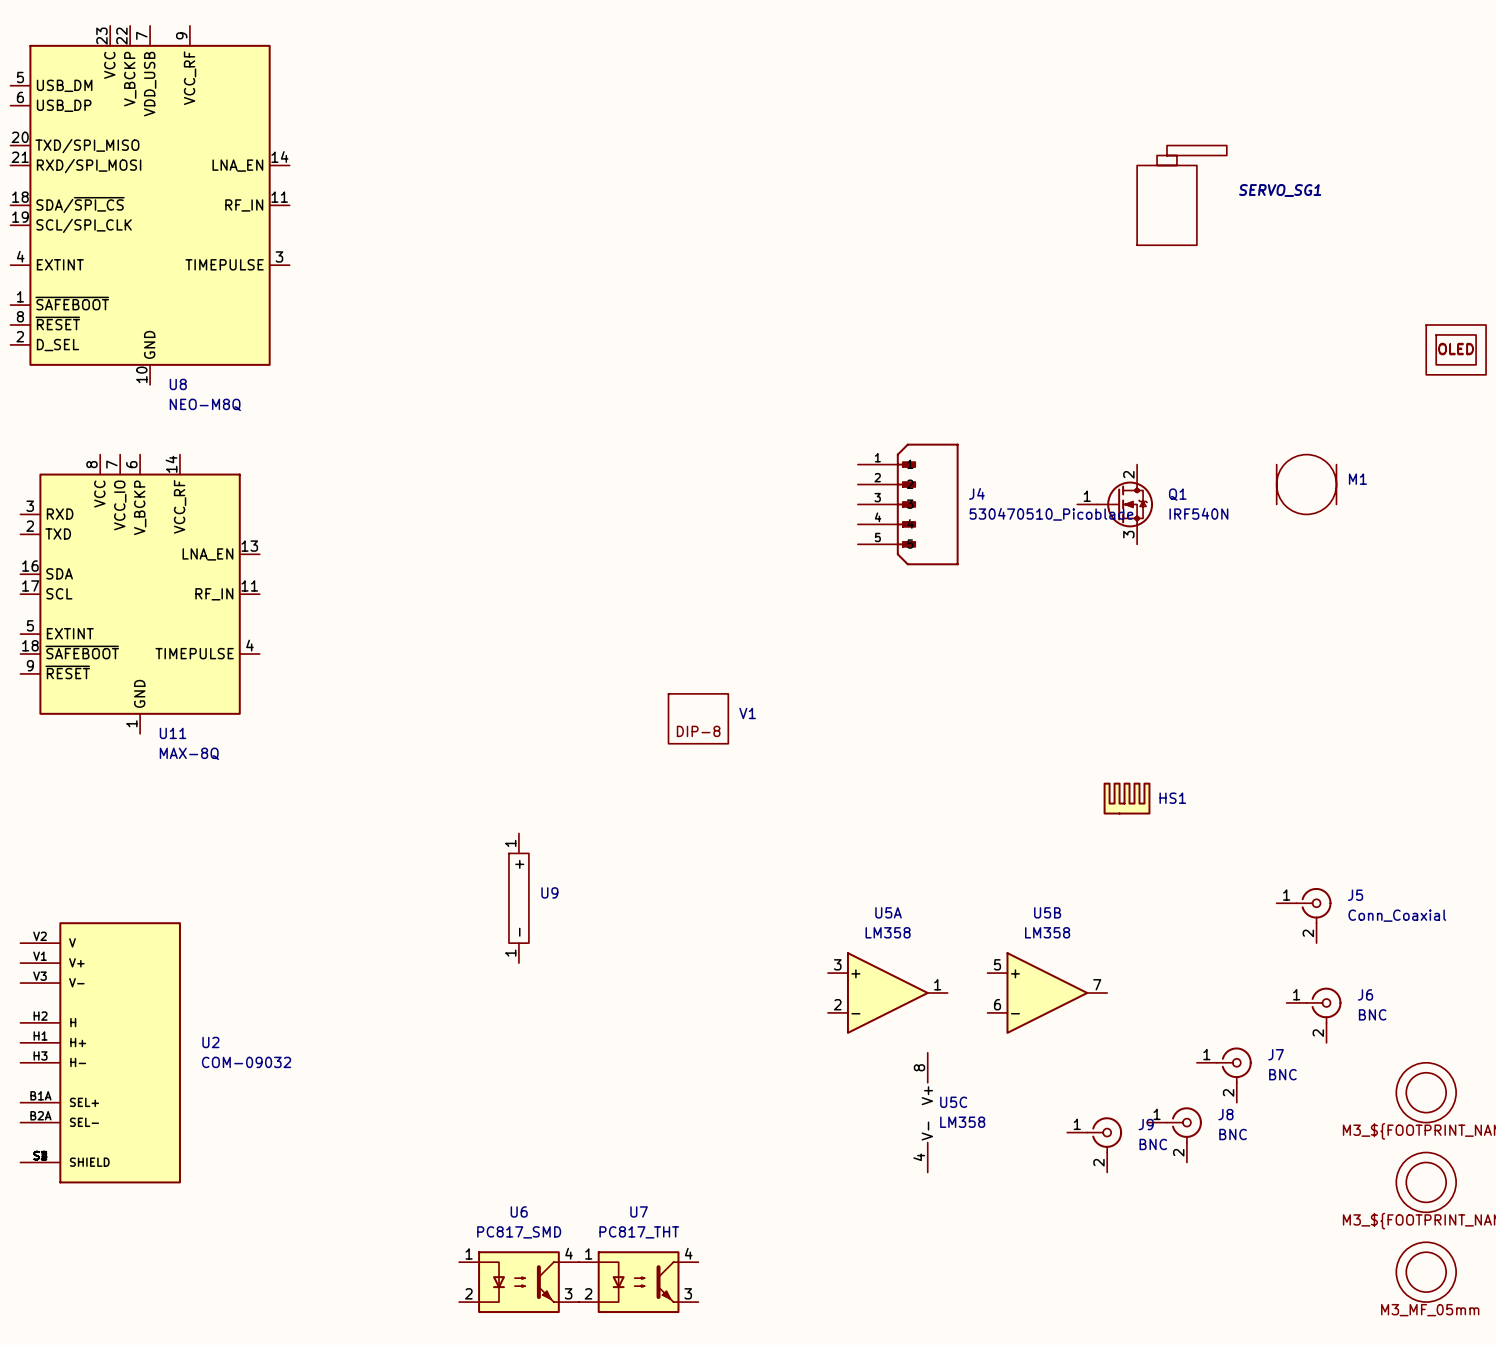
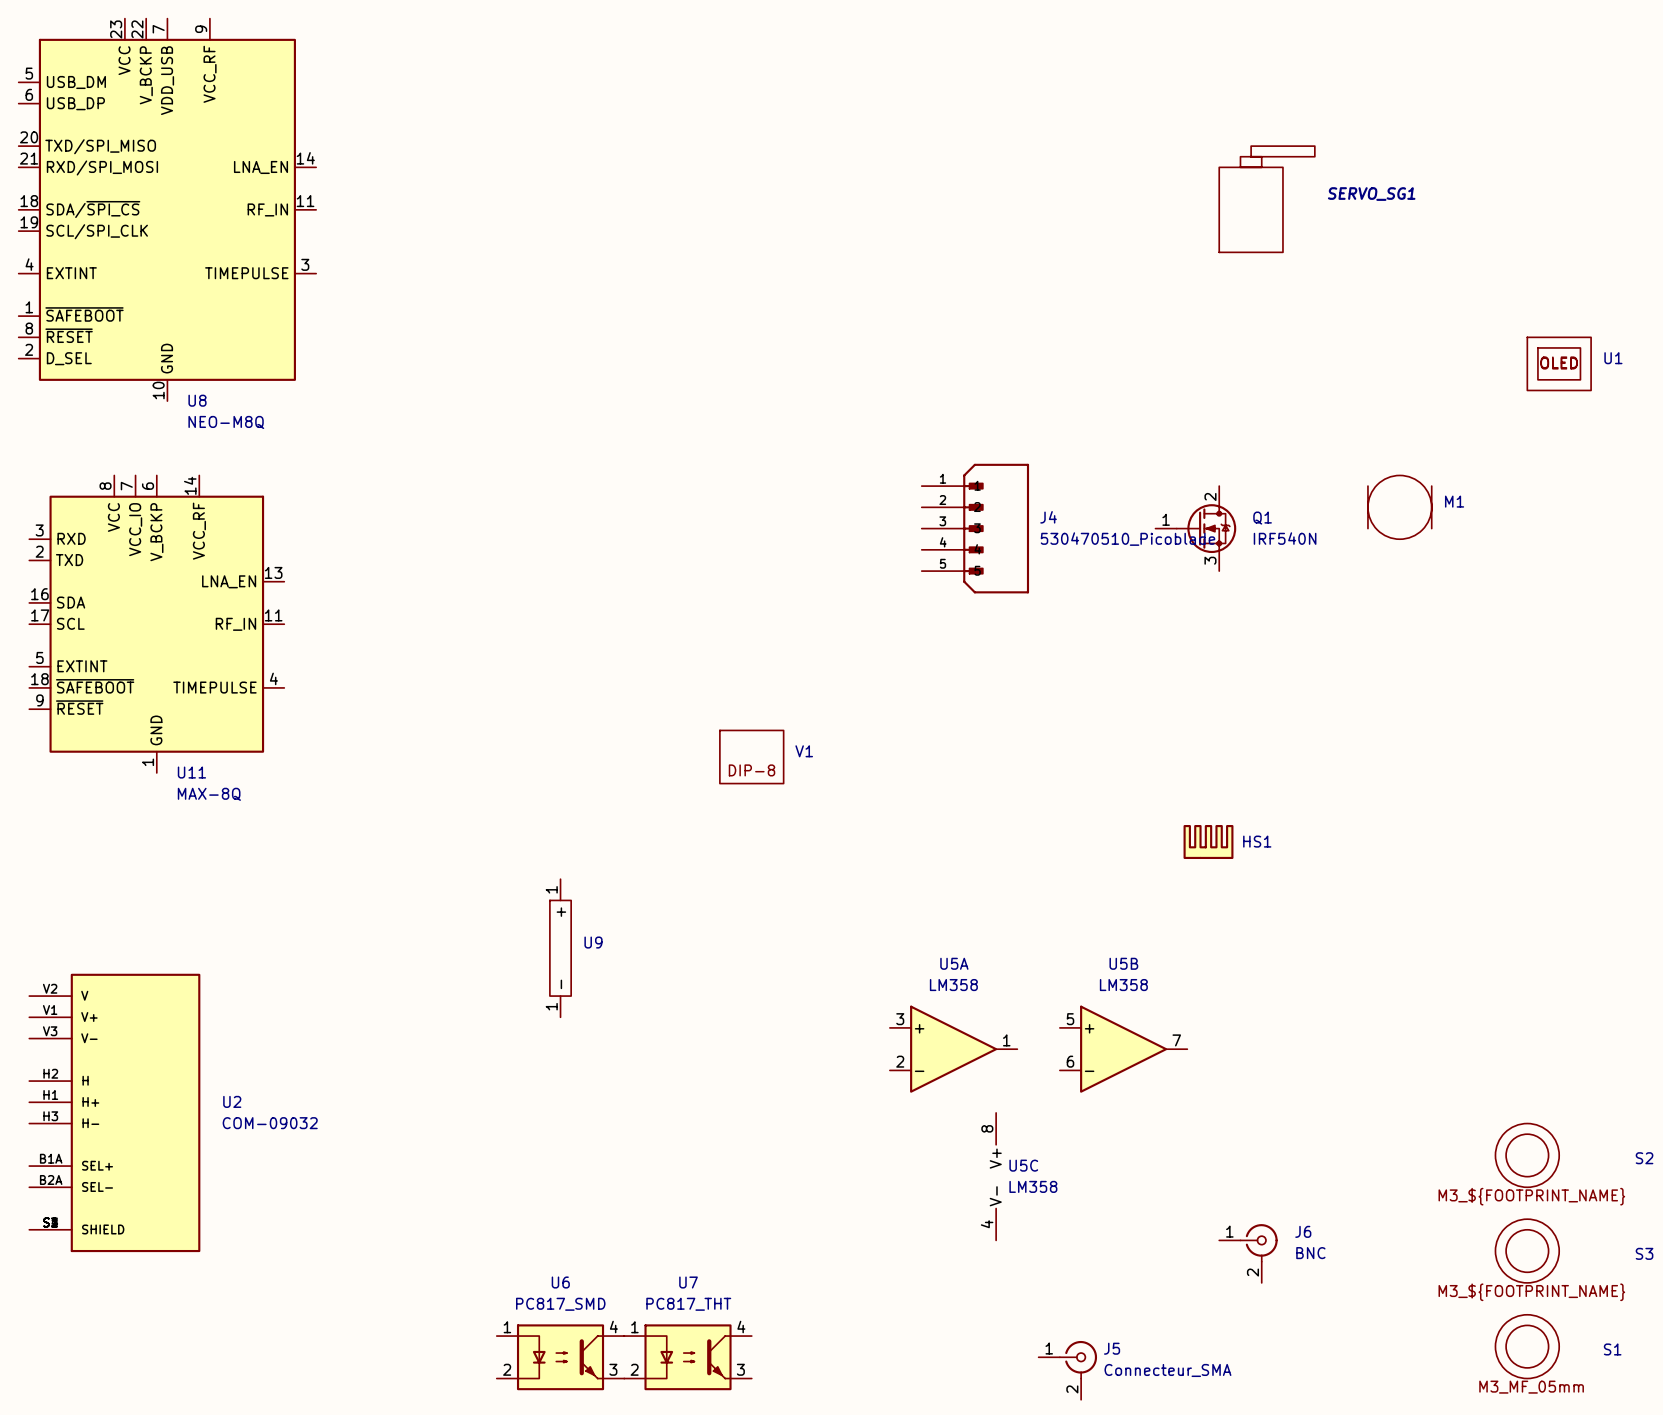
J5 name position: J5 (1355, 895) -> J5 (1112, 1348)
J5 position: (1304, 915) -> (1067, 1370)
J5 value: Conn_Coaxial (1397, 915) -> Connecteur_SMA (1167, 1370)
J6 position: (1314, 1015) -> (1248, 1253)
J7: BNC (1224, 1075) -> none
J8: BNC (1174, 1134) -> none
J9: BNC (1094, 1144) -> none

